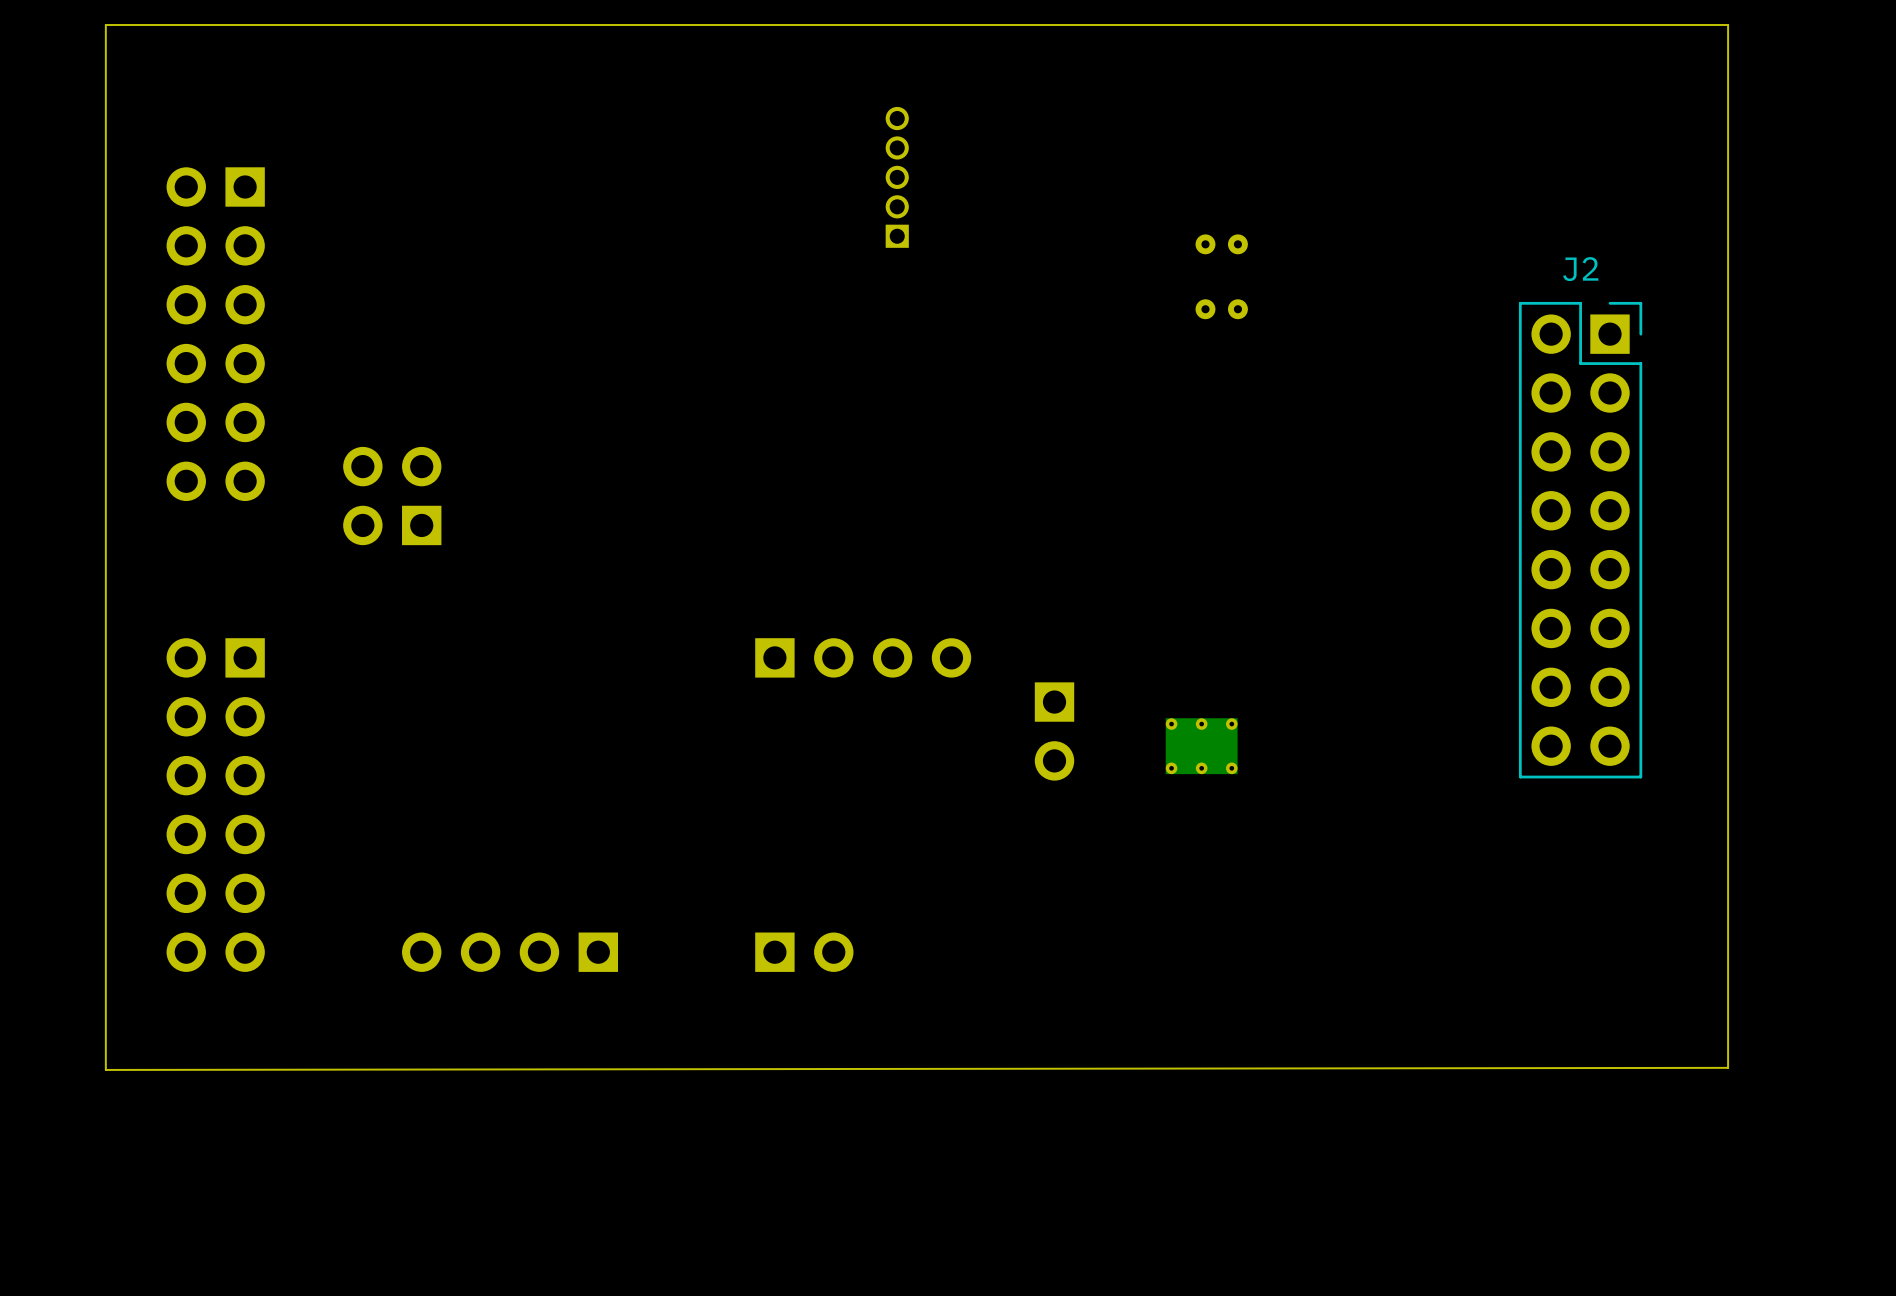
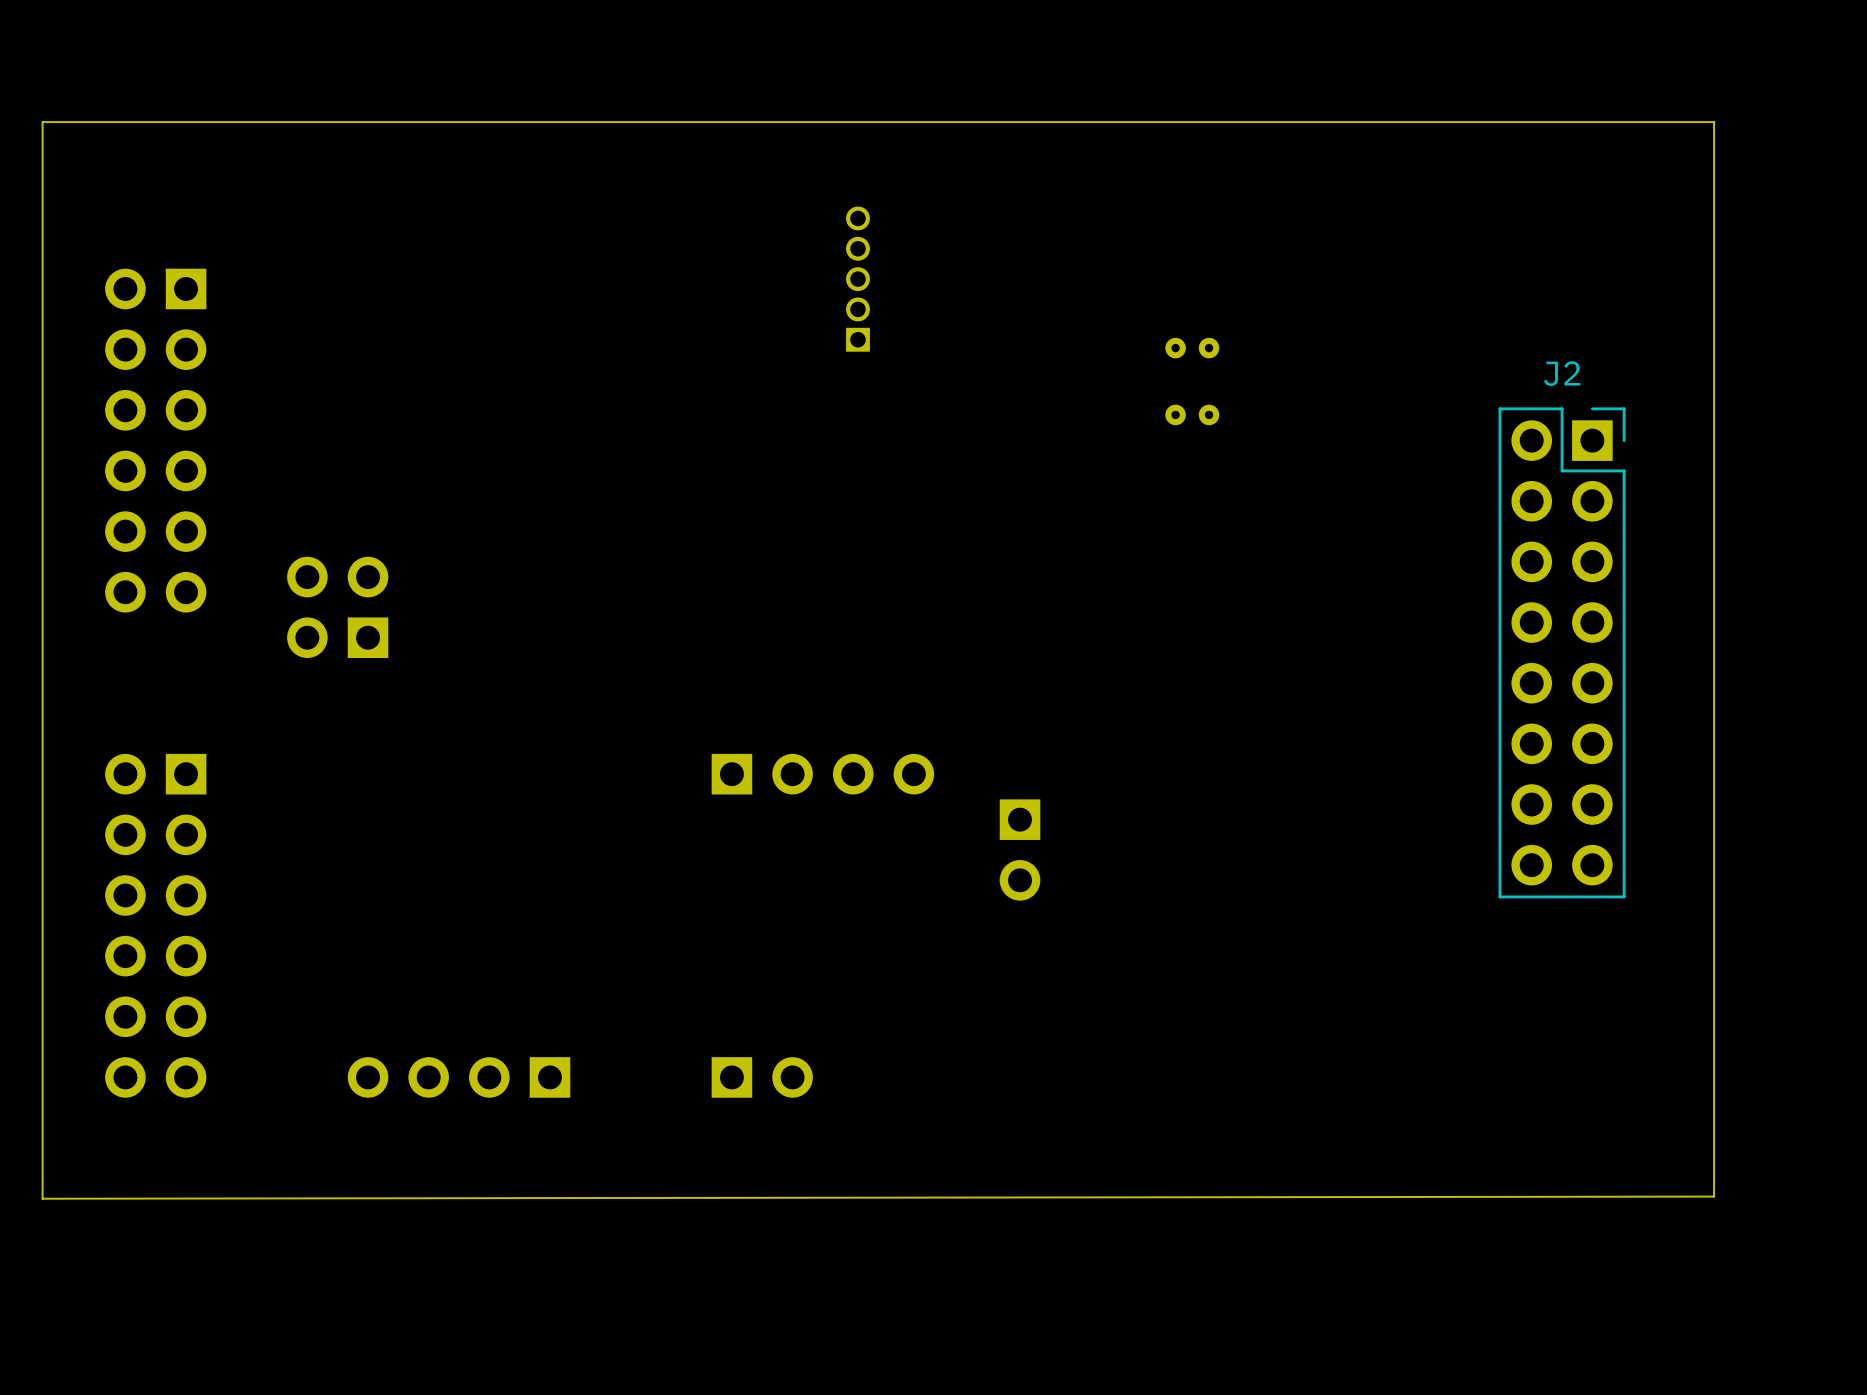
part: (1201, 746) -> none

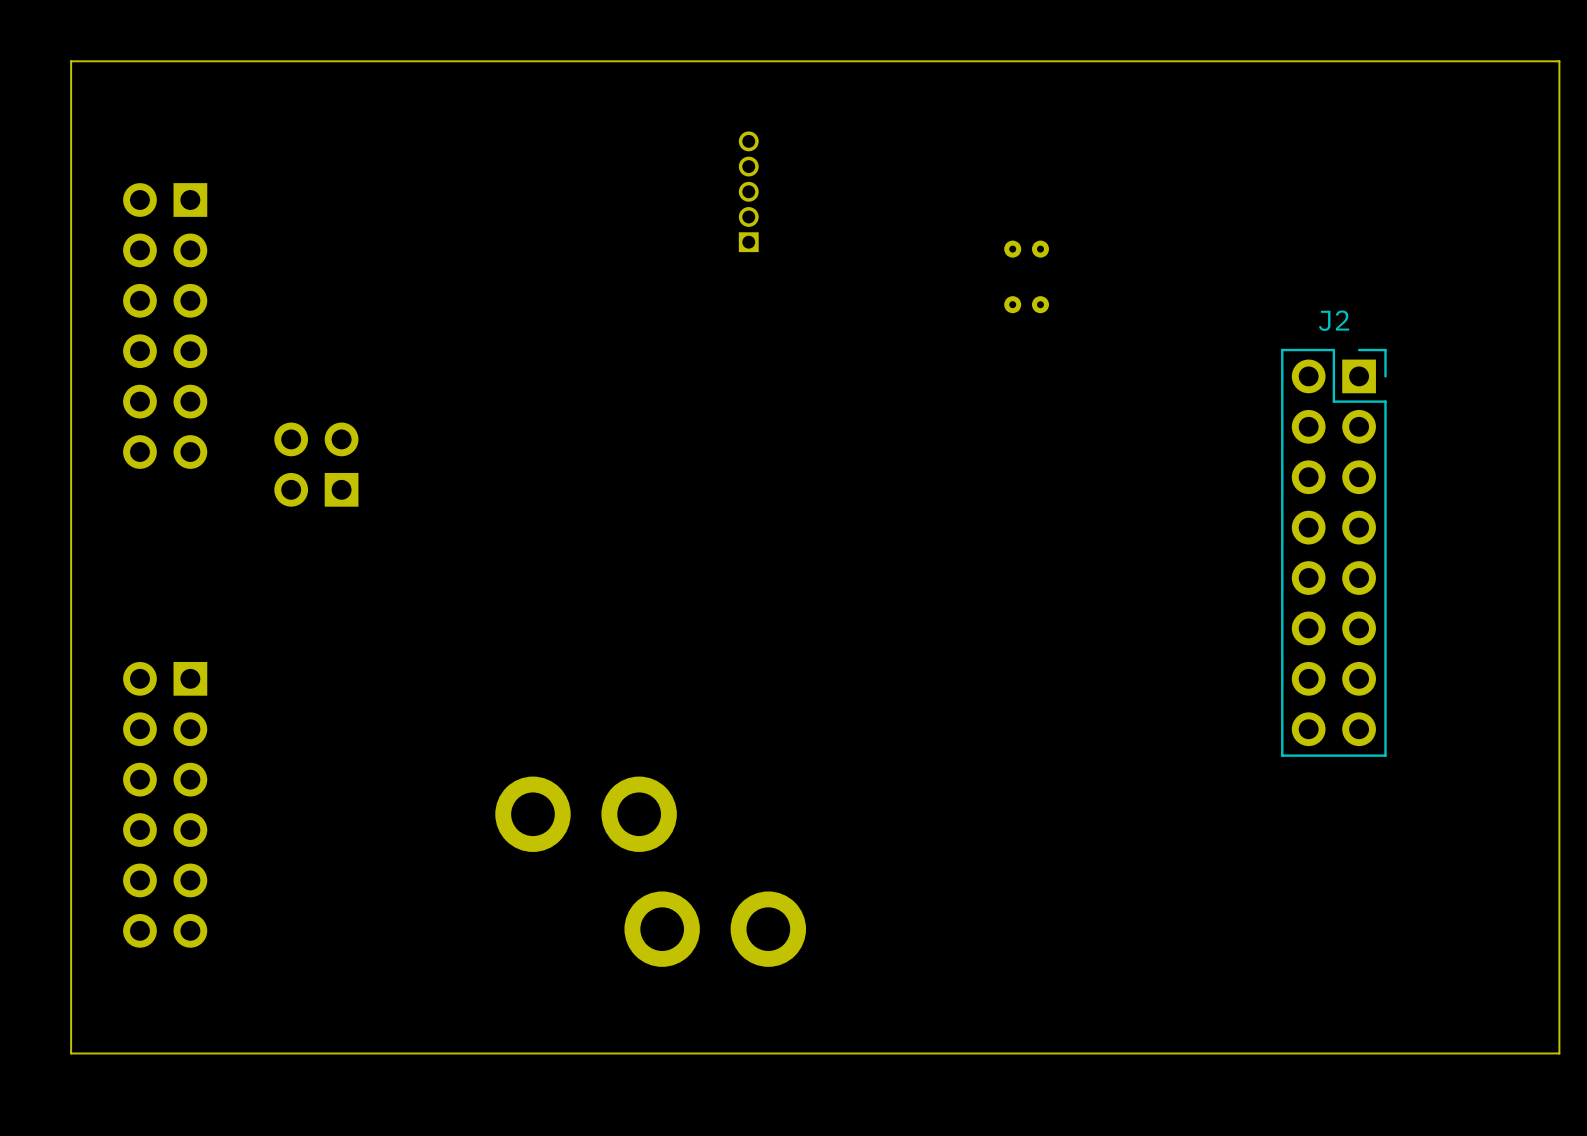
board edge: (1714, 122) (1714, 1196) (42, 1198) -> (1460, 61) (1559, 61) (1559, 1053) (71, 1053) (71, 956)
J2 position: (1562, 652) -> (1333, 552)
part: (822, 774) -> none
part: (1020, 850) -> none
part position: (155, 925) -> (165, 804)
part: none -> (532, 814)
part: none -> (639, 814)
part: (459, 1077) -> none
part: (762, 1077) -> none
part: none -> (662, 929)
part: none -> (768, 929)

